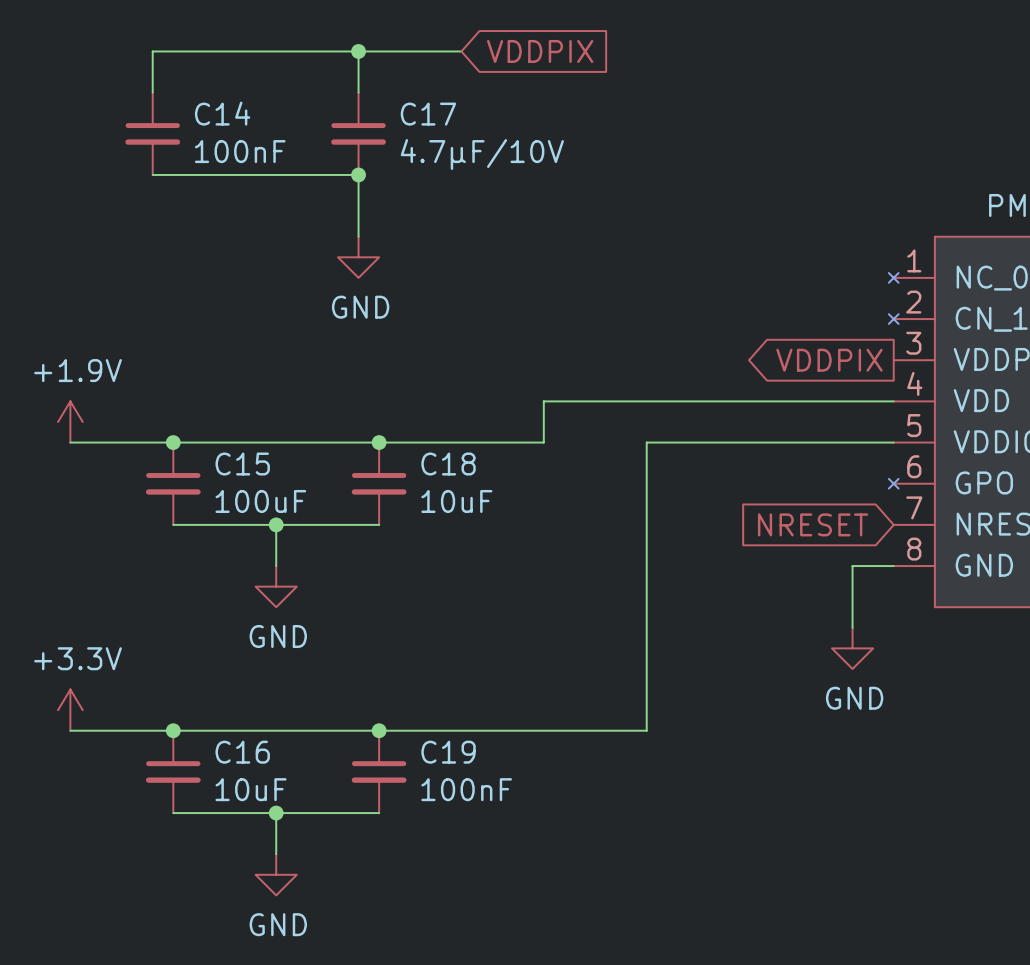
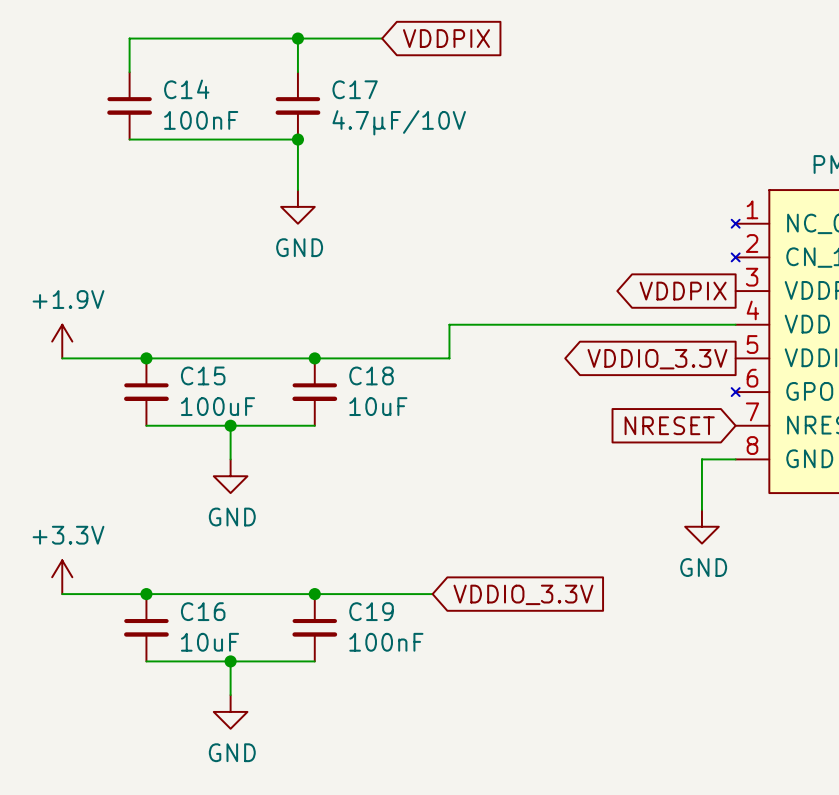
wire: (893, 442) (646, 442) (646, 730) (523, 730) -> none
global label: none -> VDDIO_3.3V (657, 359)
global label: none -> VDDIO_3.3V (523, 594)

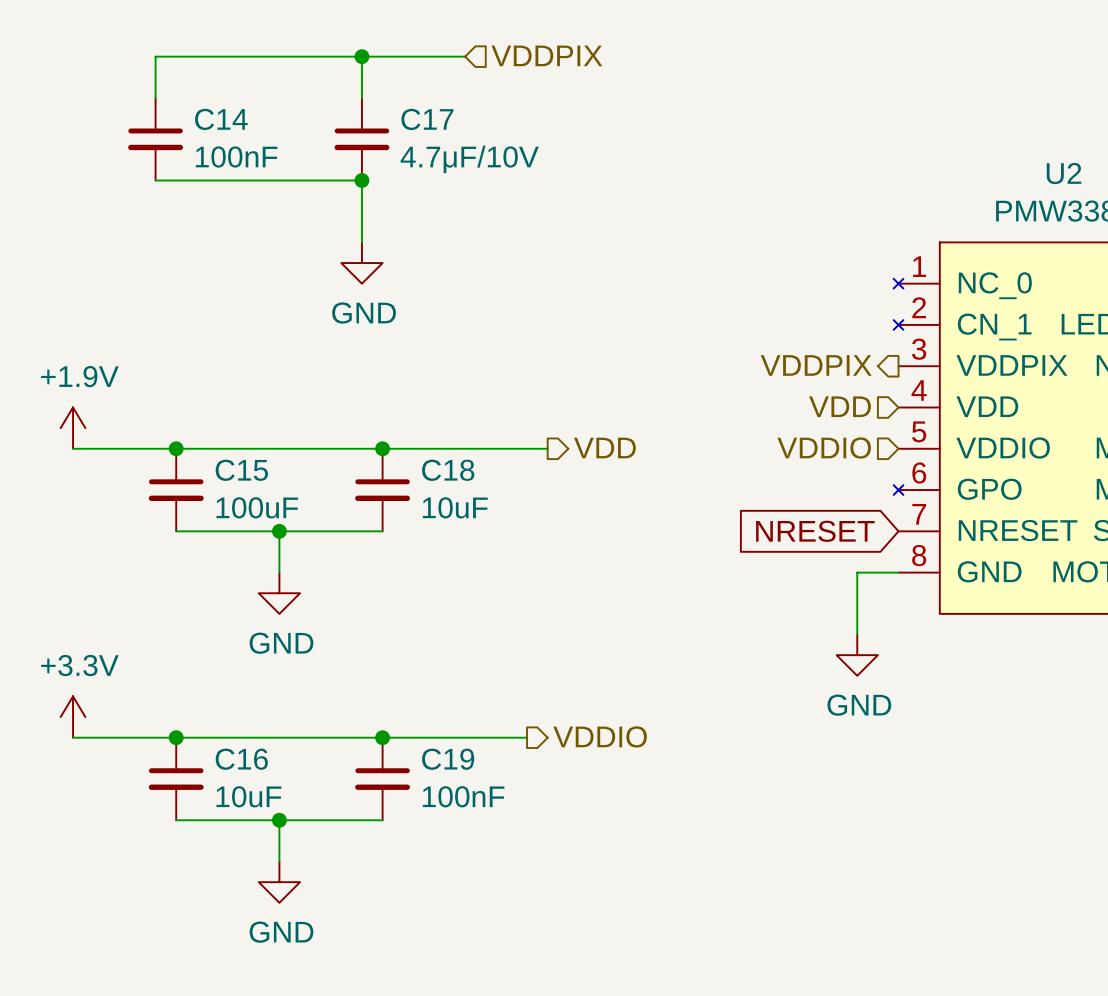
hierarchical label: none -> VDDPIX (546, 55)
global label: VDDPIX (446, 38) -> none
hierarchical label: none -> VDDPIX (816, 365)
global label: VDDPIX (683, 291) -> none
hierarchical label: none -> VDD (840, 406)
wire: (735, 324) (449, 324) (449, 358) -> none
hierarchical label: none -> VDD (604, 448)
hierarchical label: none -> VDDIO (824, 448)
global label: VDDIO_3.3V (657, 359) -> none
hierarchical label: none -> VDDIO (600, 736)
global label: VDDIO_3.3V (523, 594) -> none

